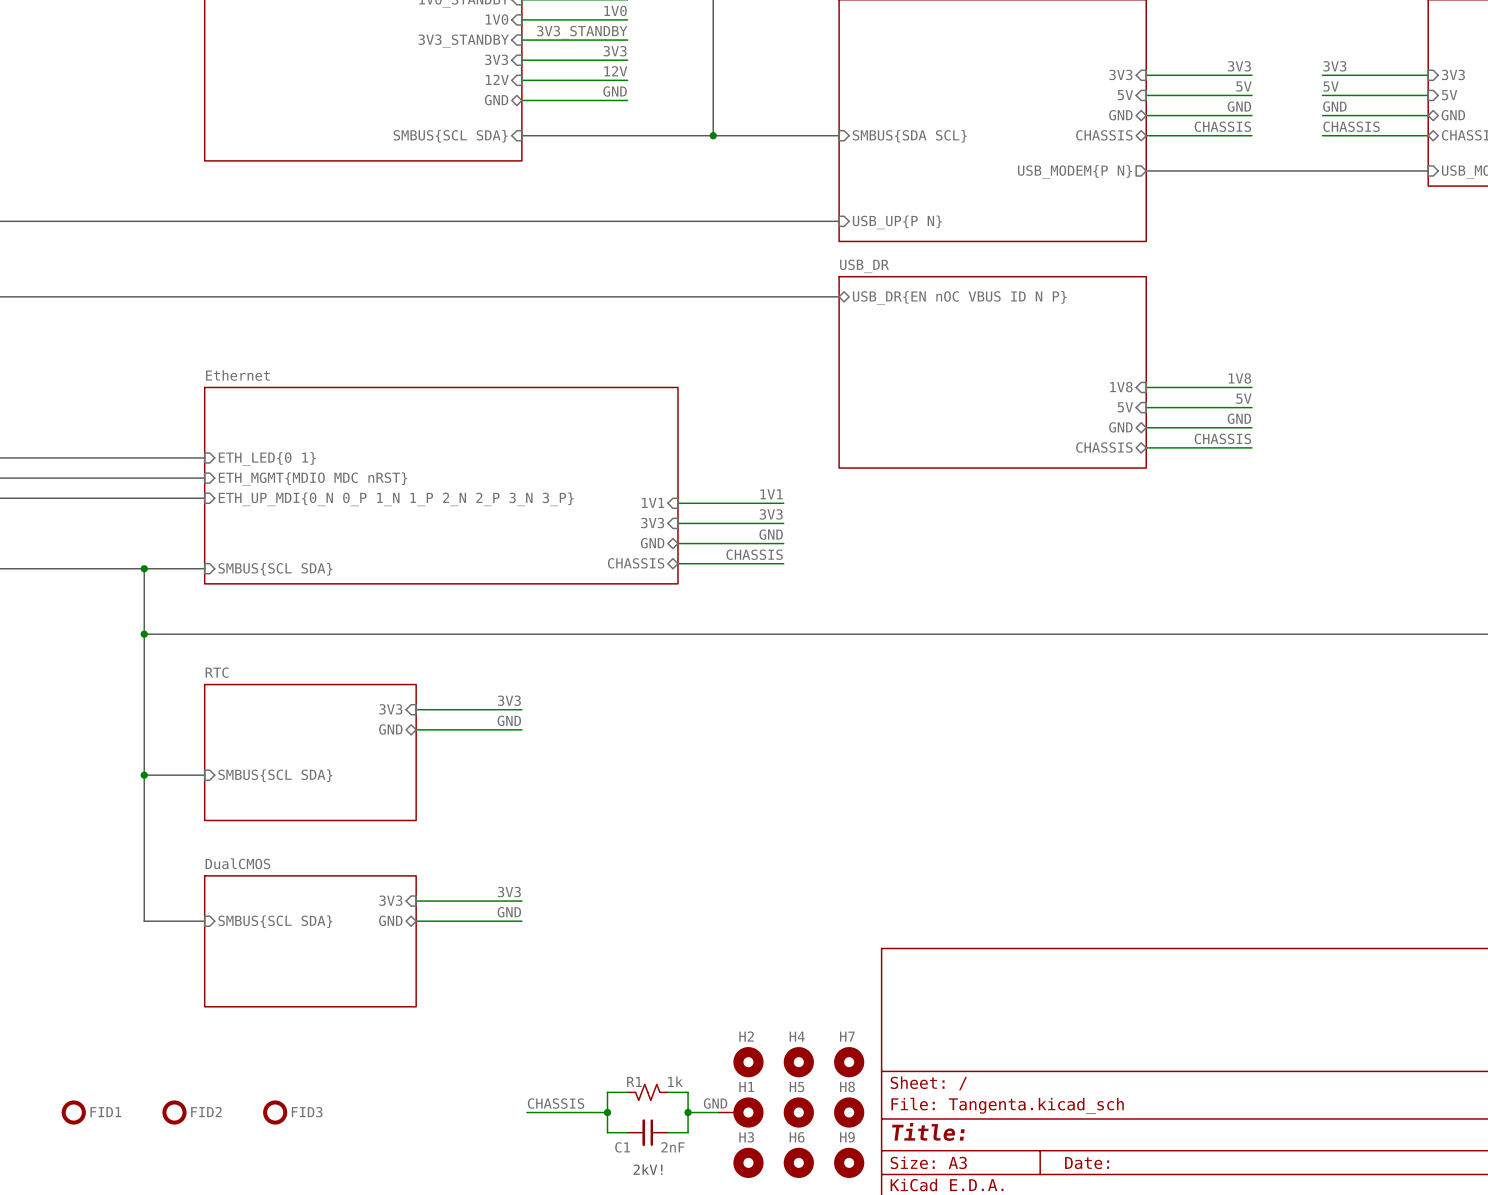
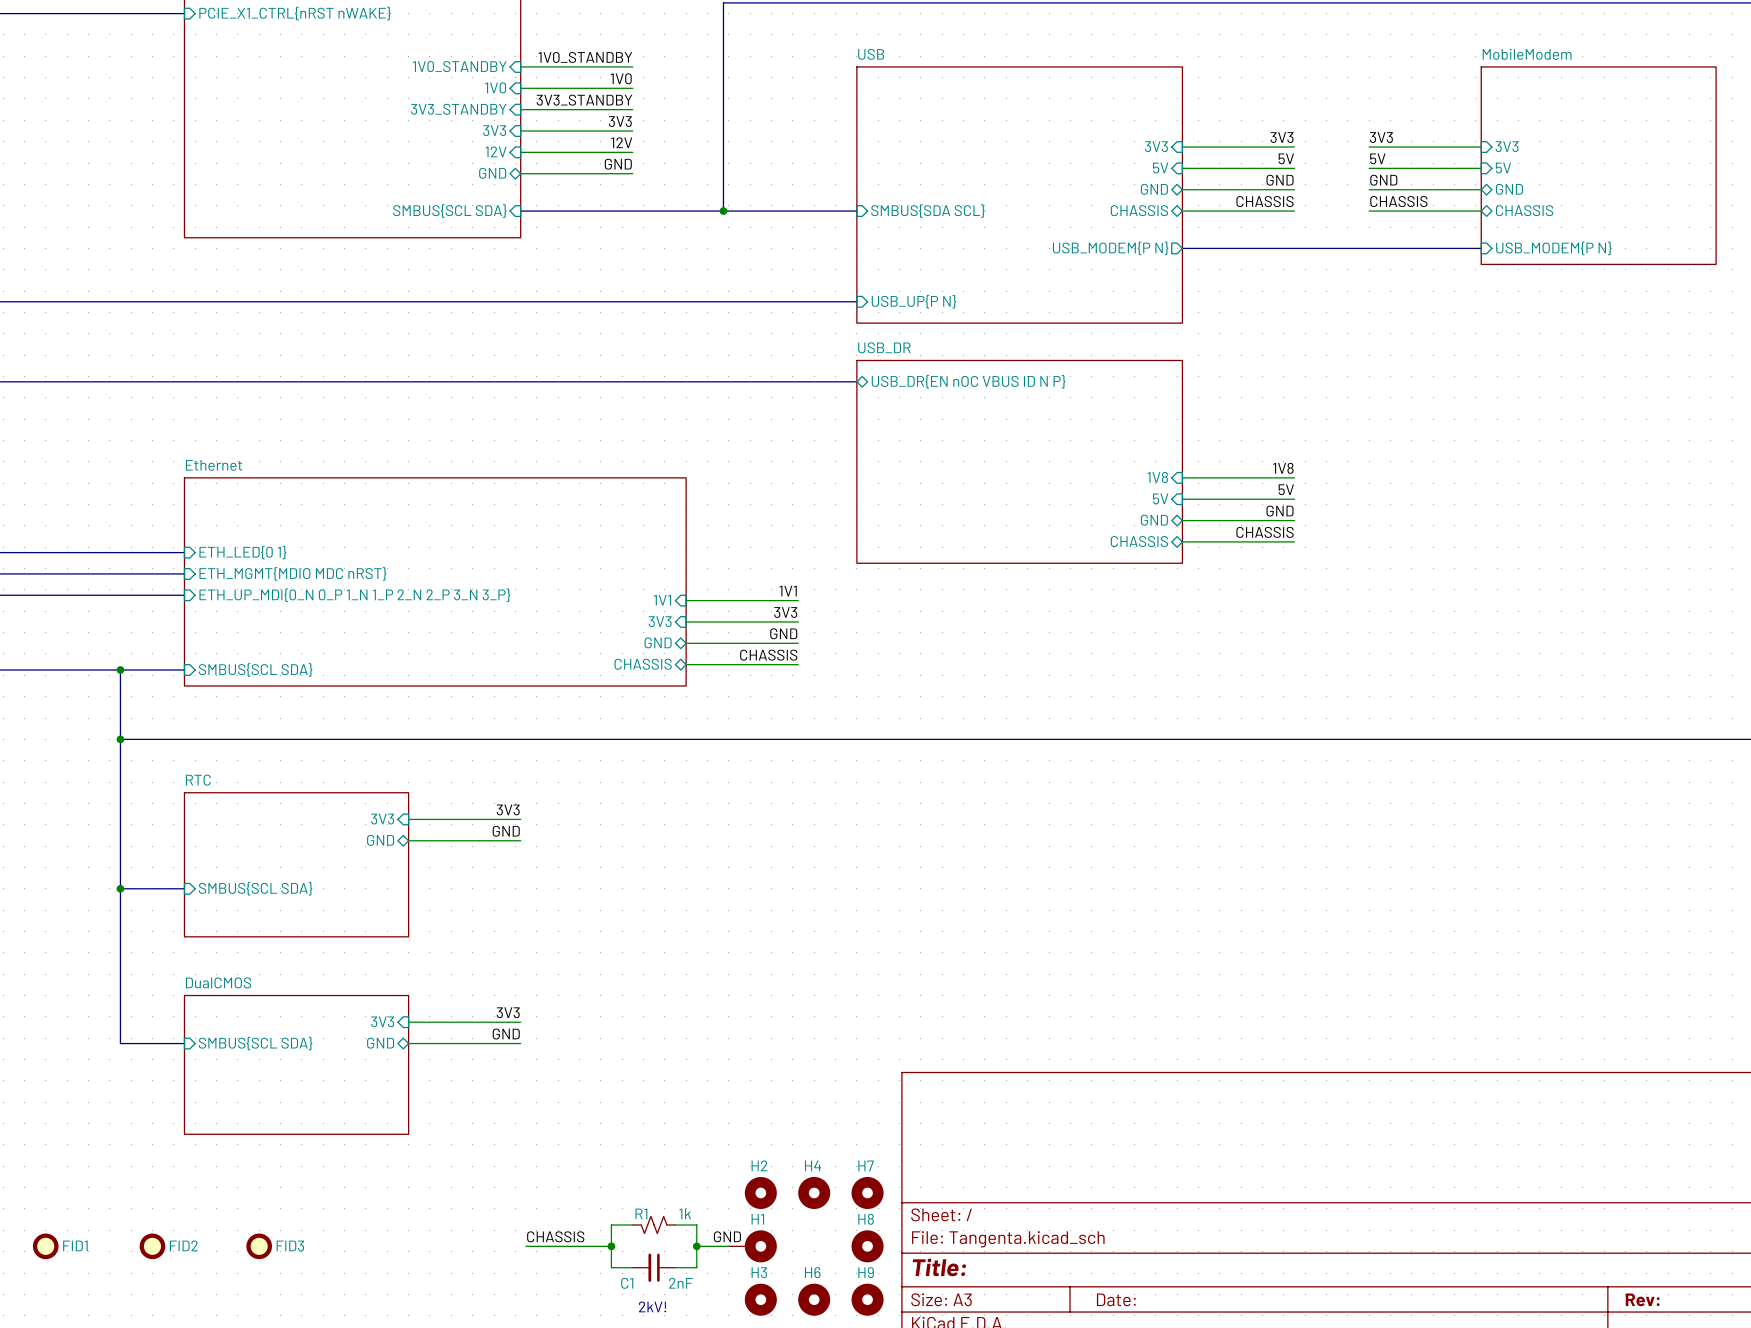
H5: (798, 1112) -> none

